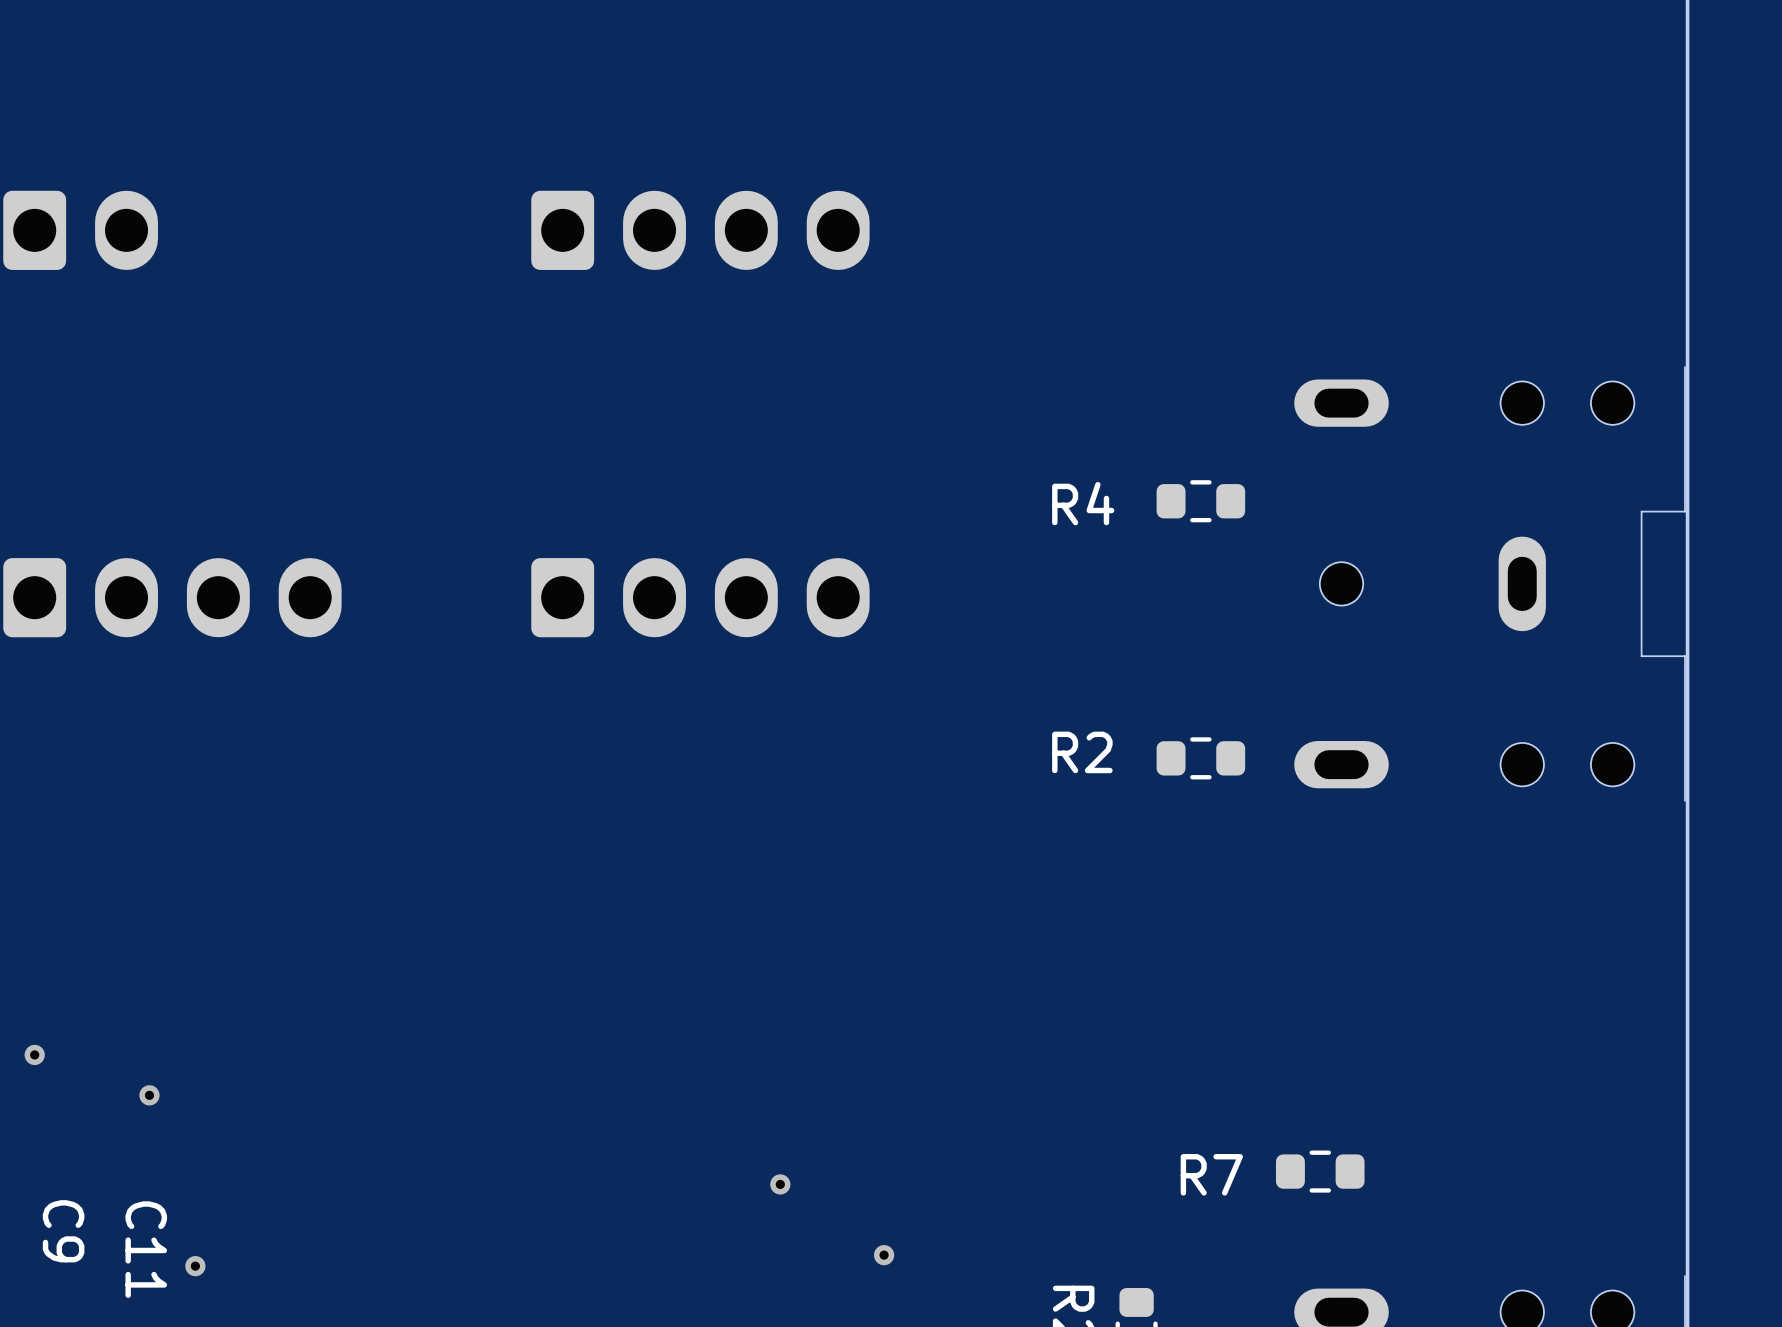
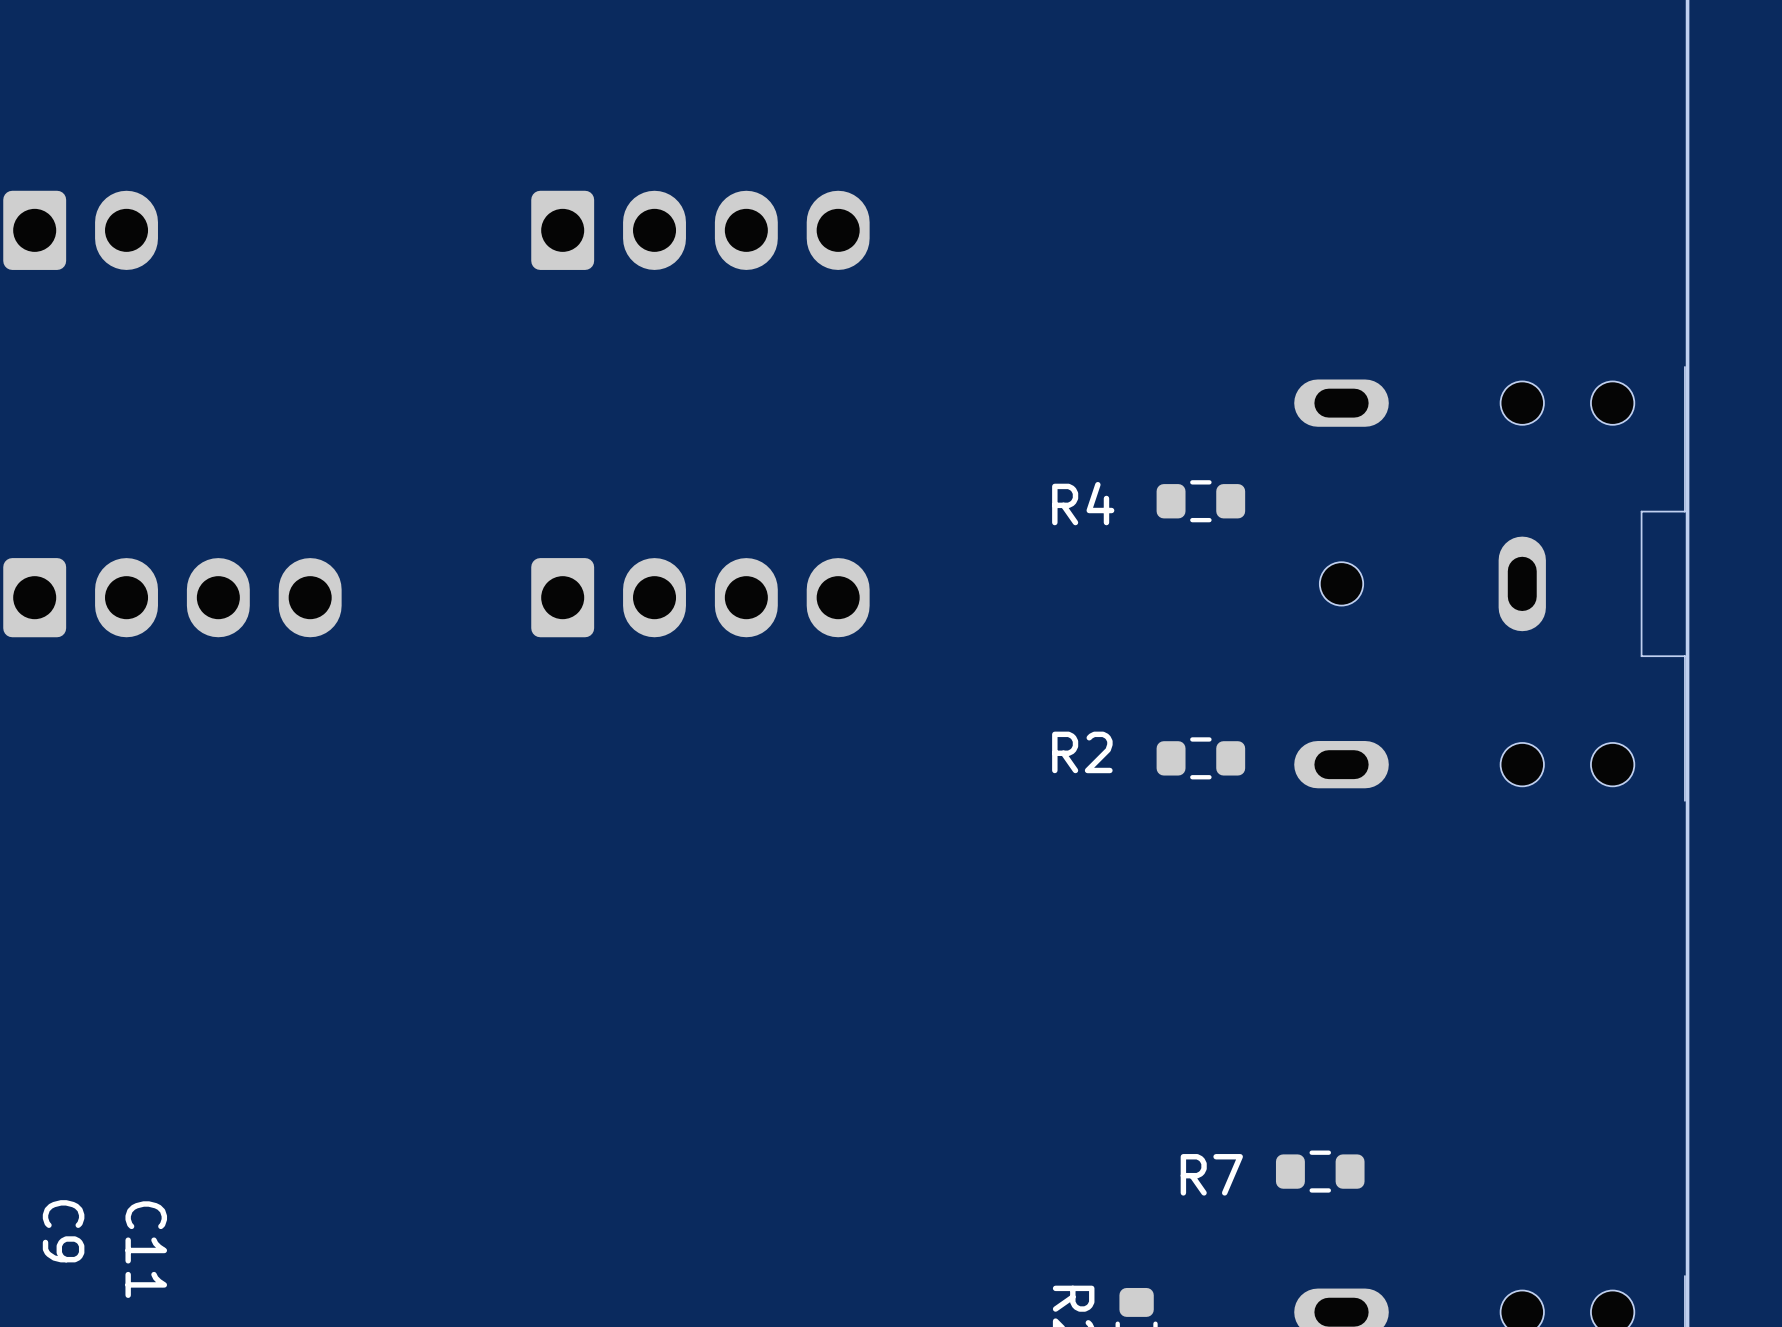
via: (34, 1054) -> none
via: (149, 1095) -> none
via: (780, 1184) -> none
via: (884, 1255) -> none
via: (195, 1266) -> none

